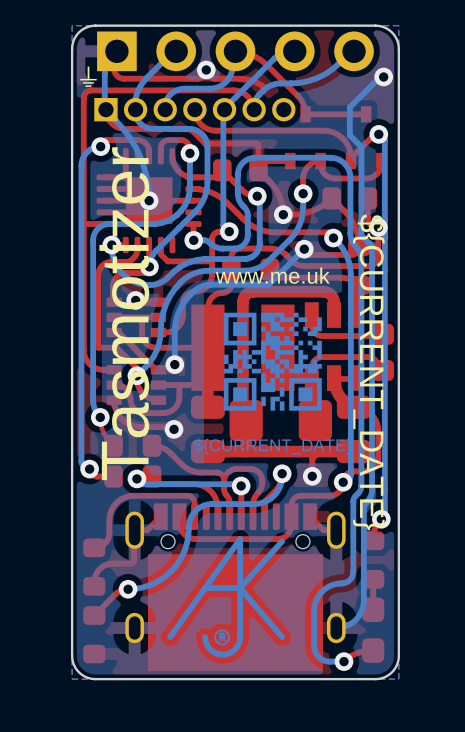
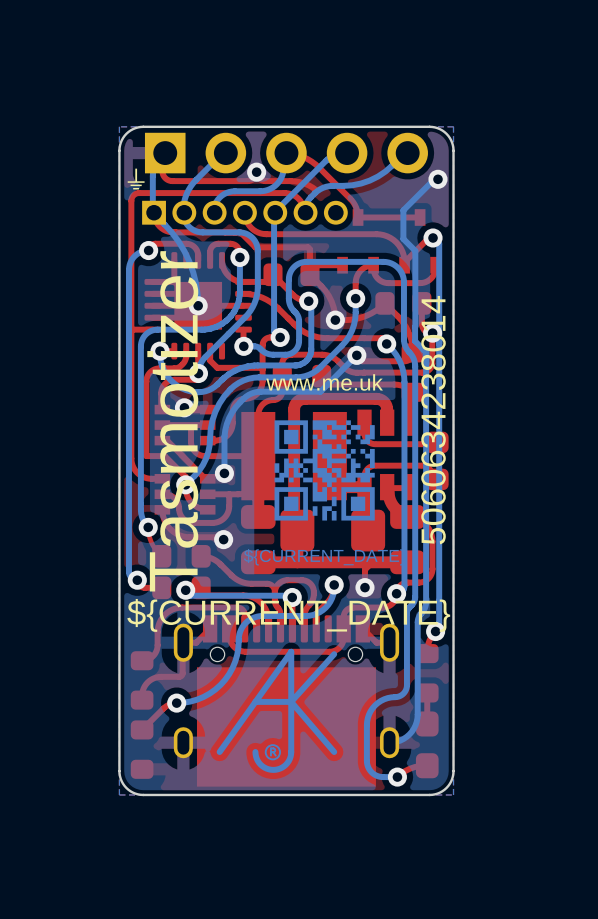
text: none -> 5060634238014 (433, 420)
text rotation: 0° (369, 372) -> 90° counterclockwise (288, 615)

